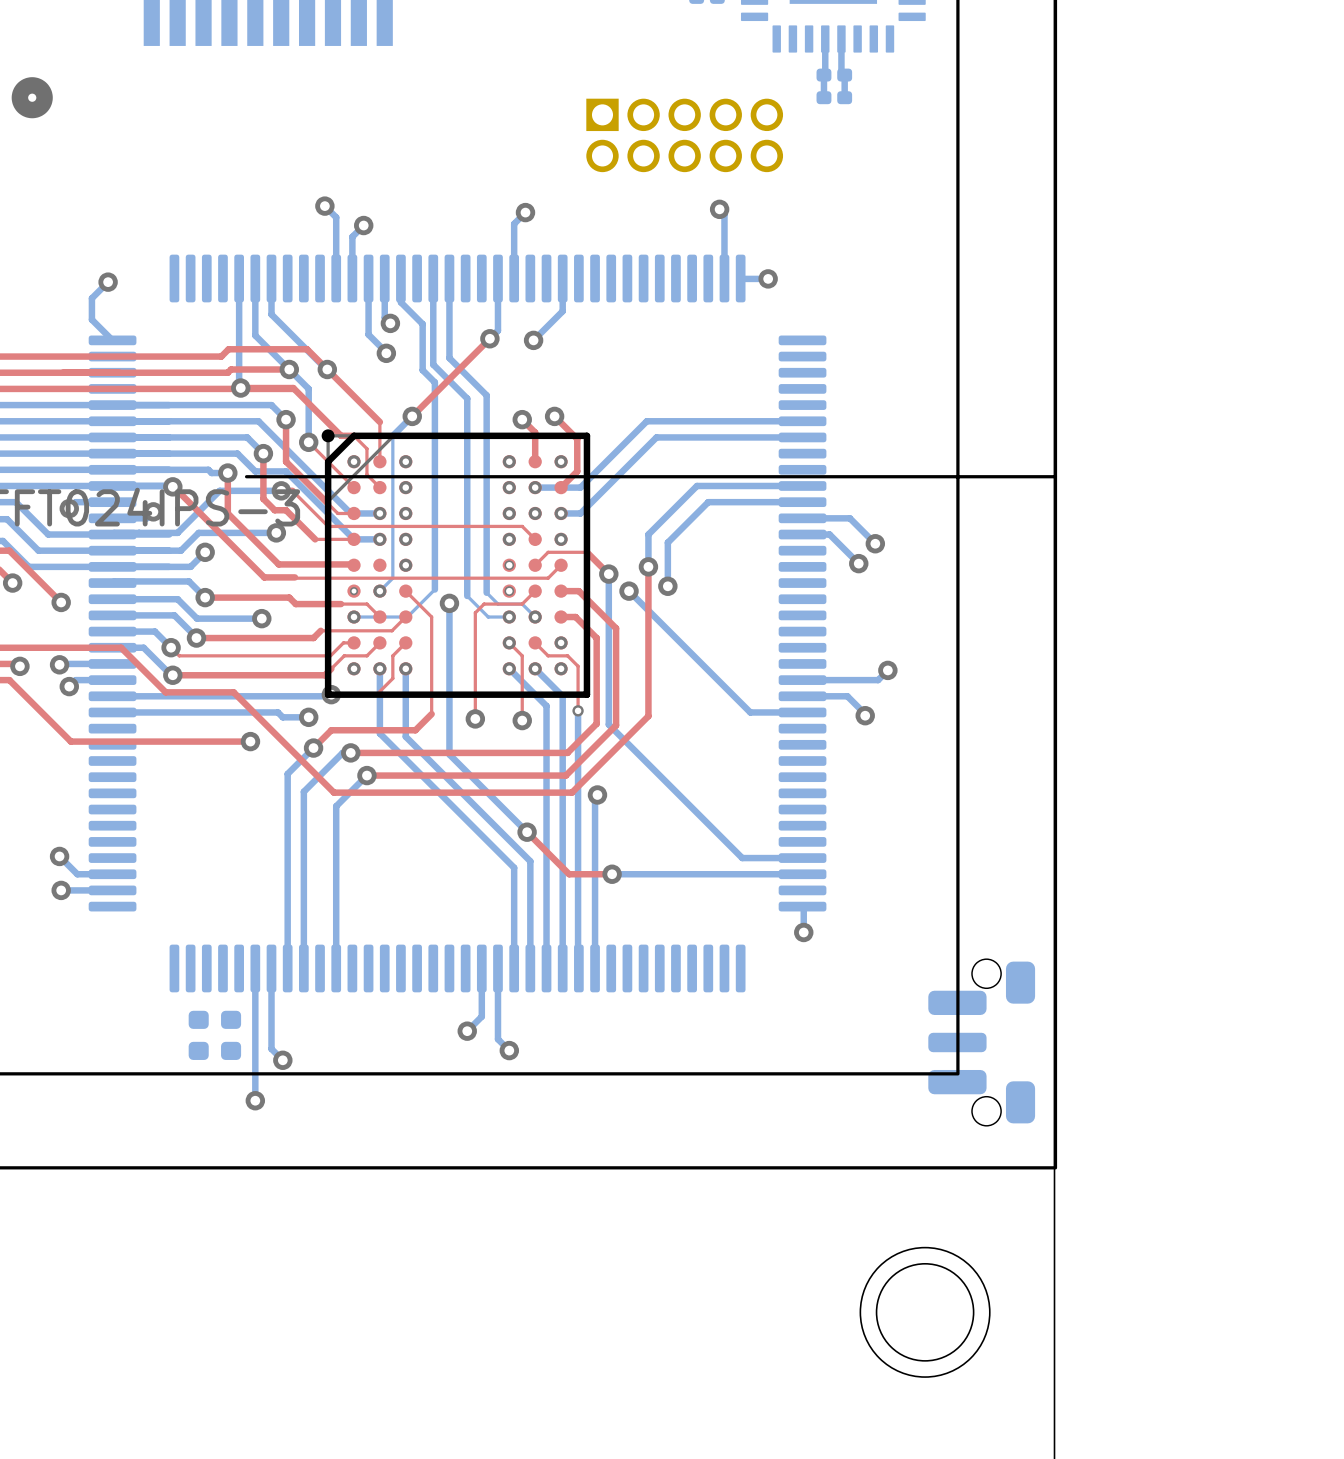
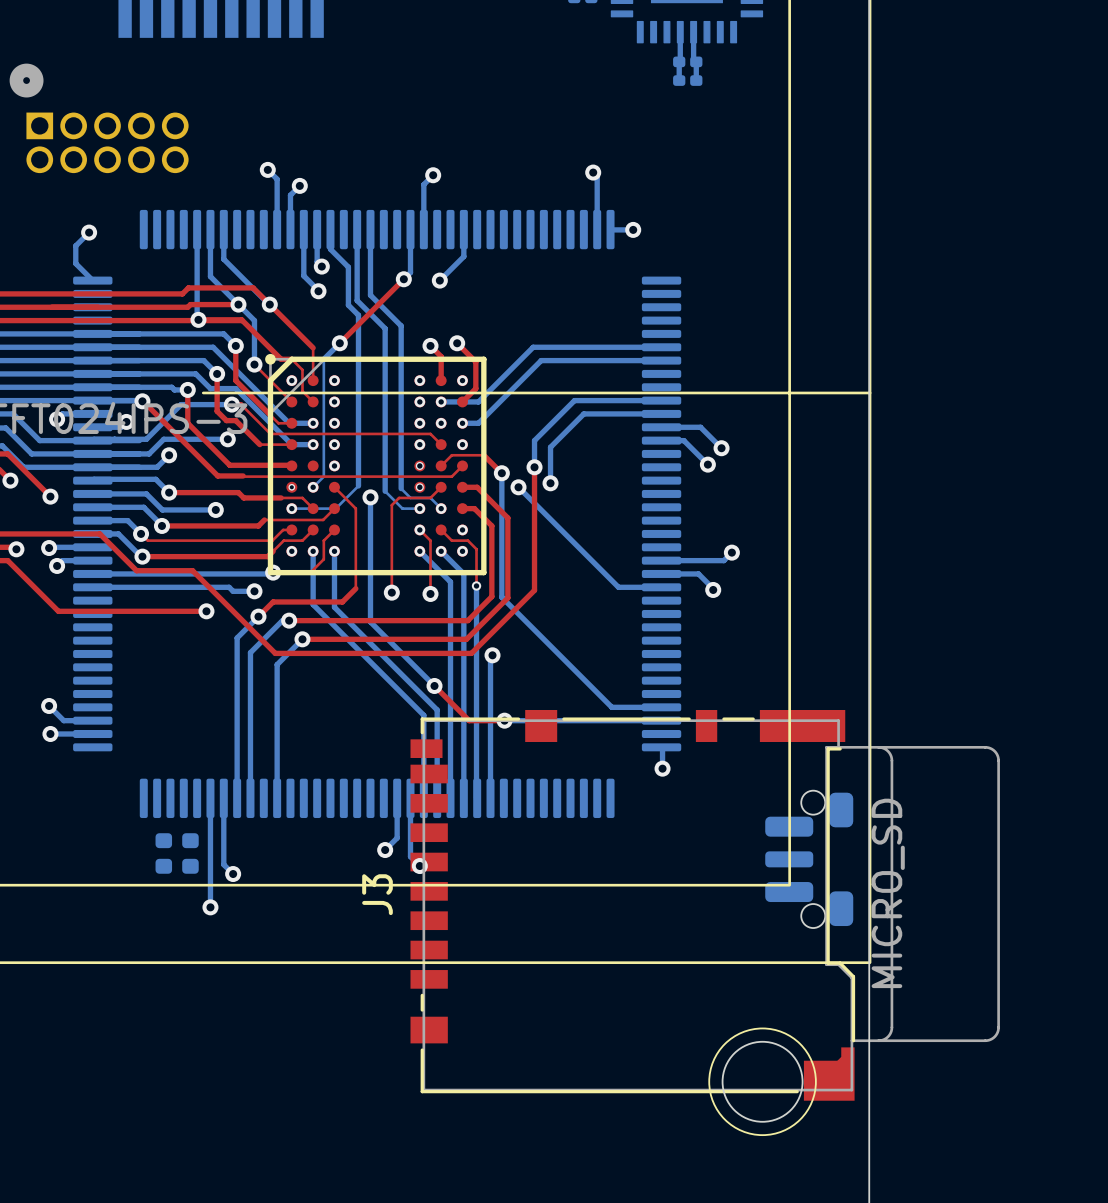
part position: (684, 135) -> (107, 142)
J3: none -> MICRO_SD (705, 905)

